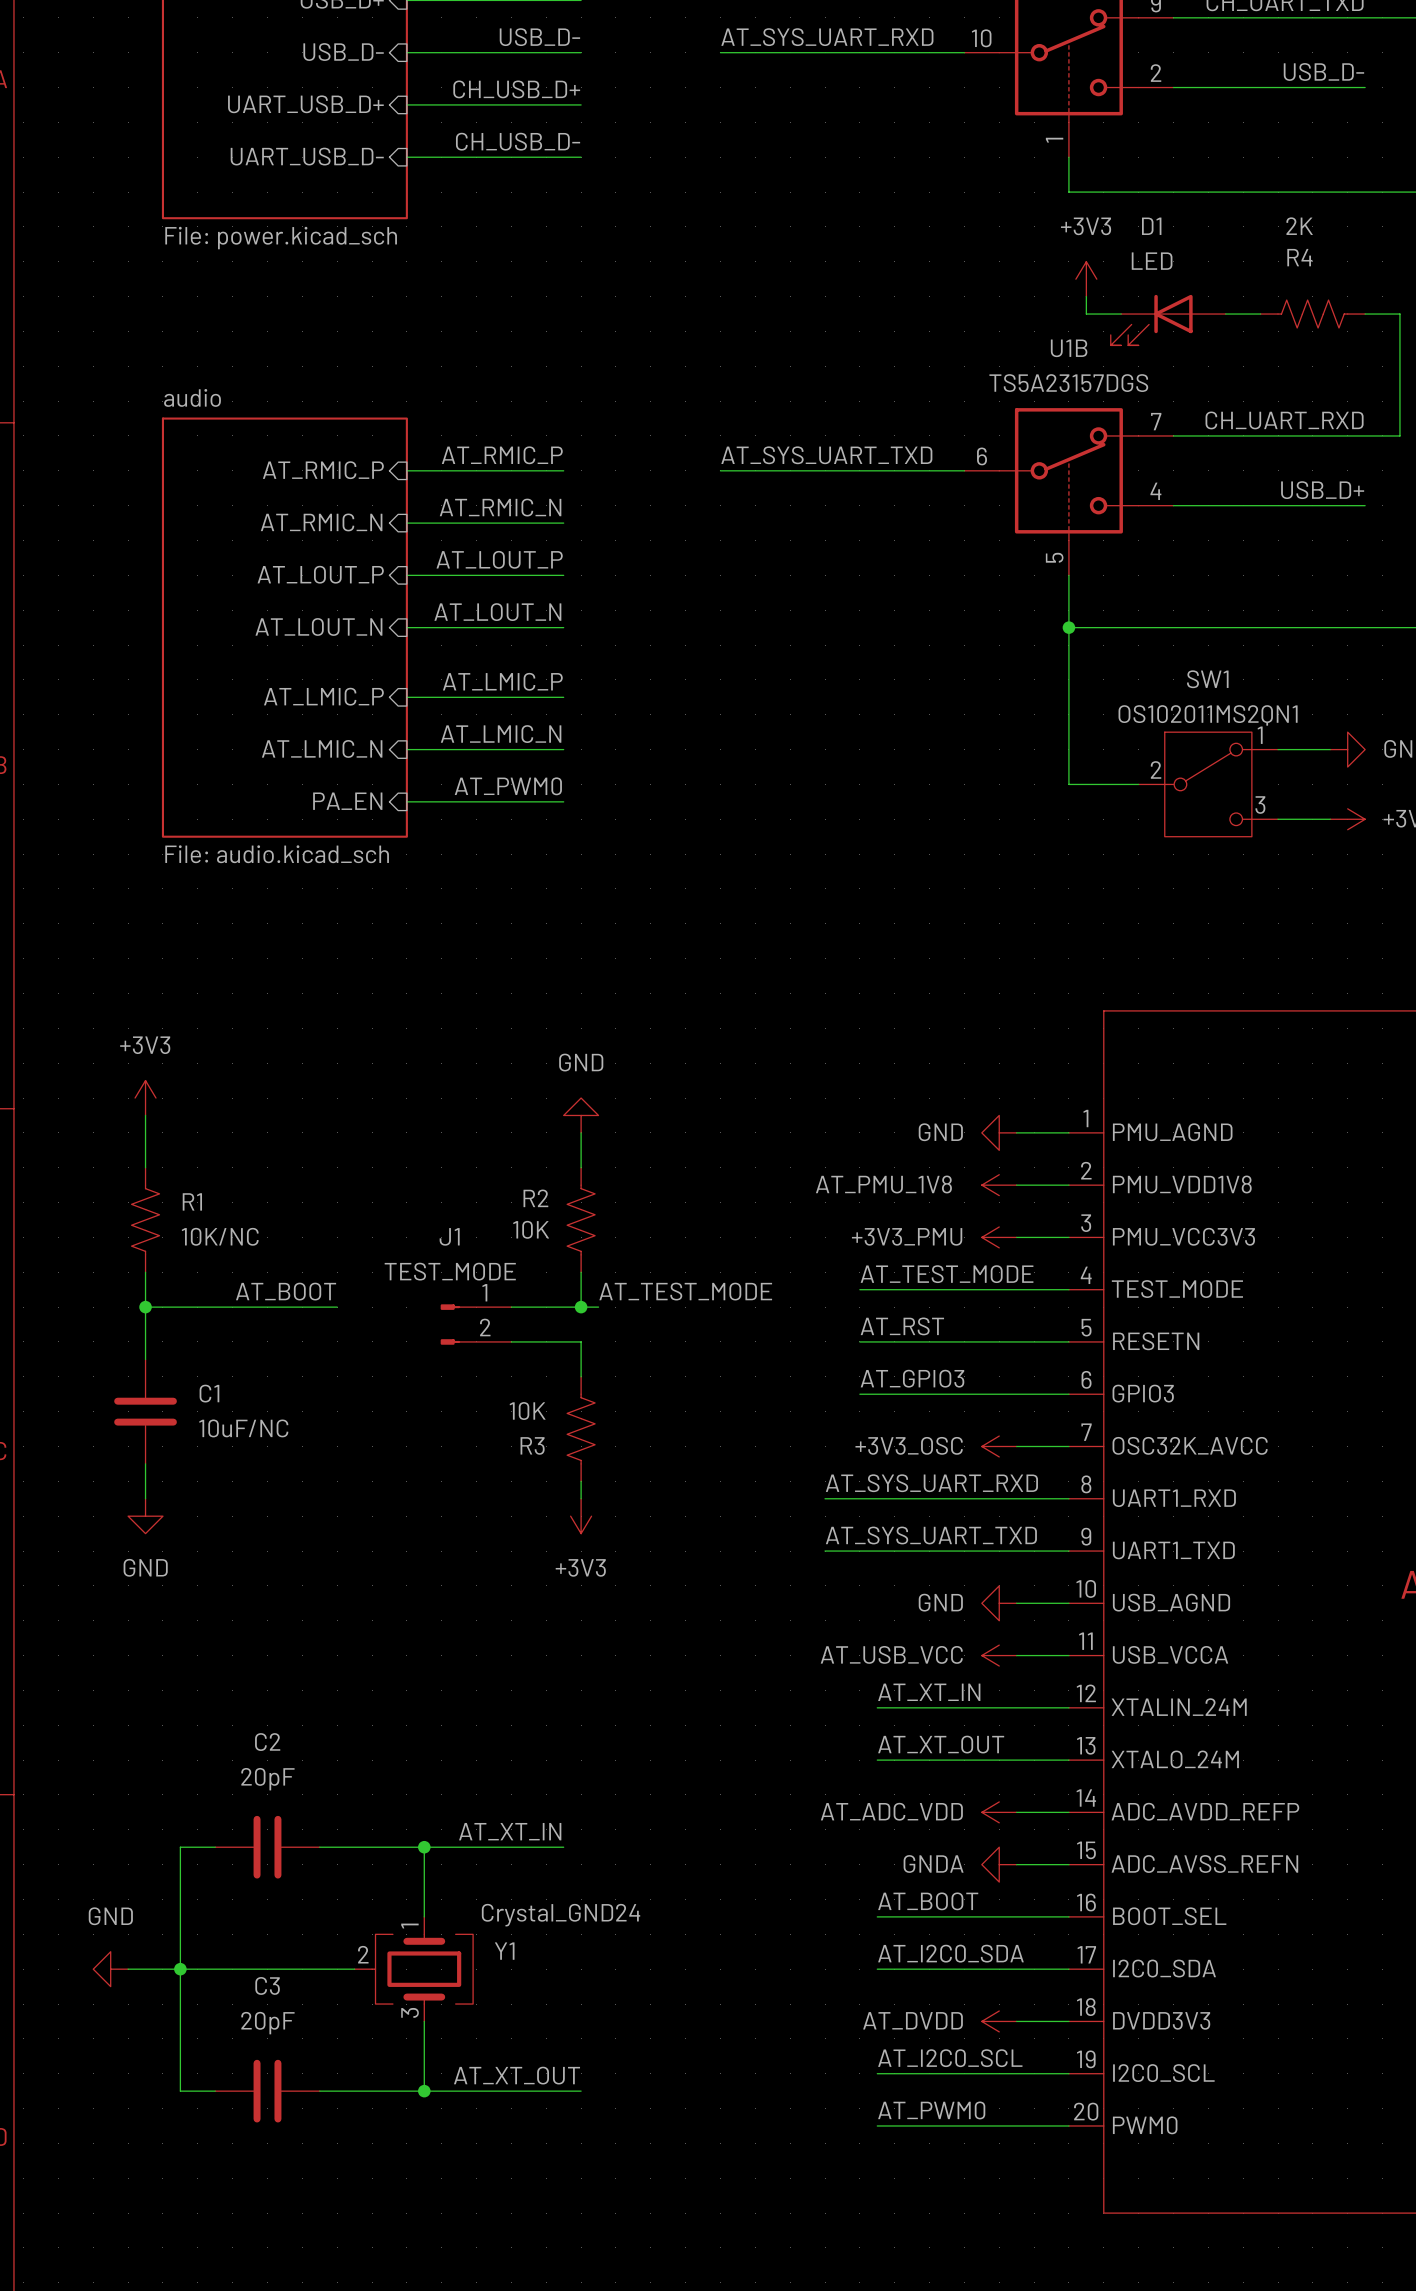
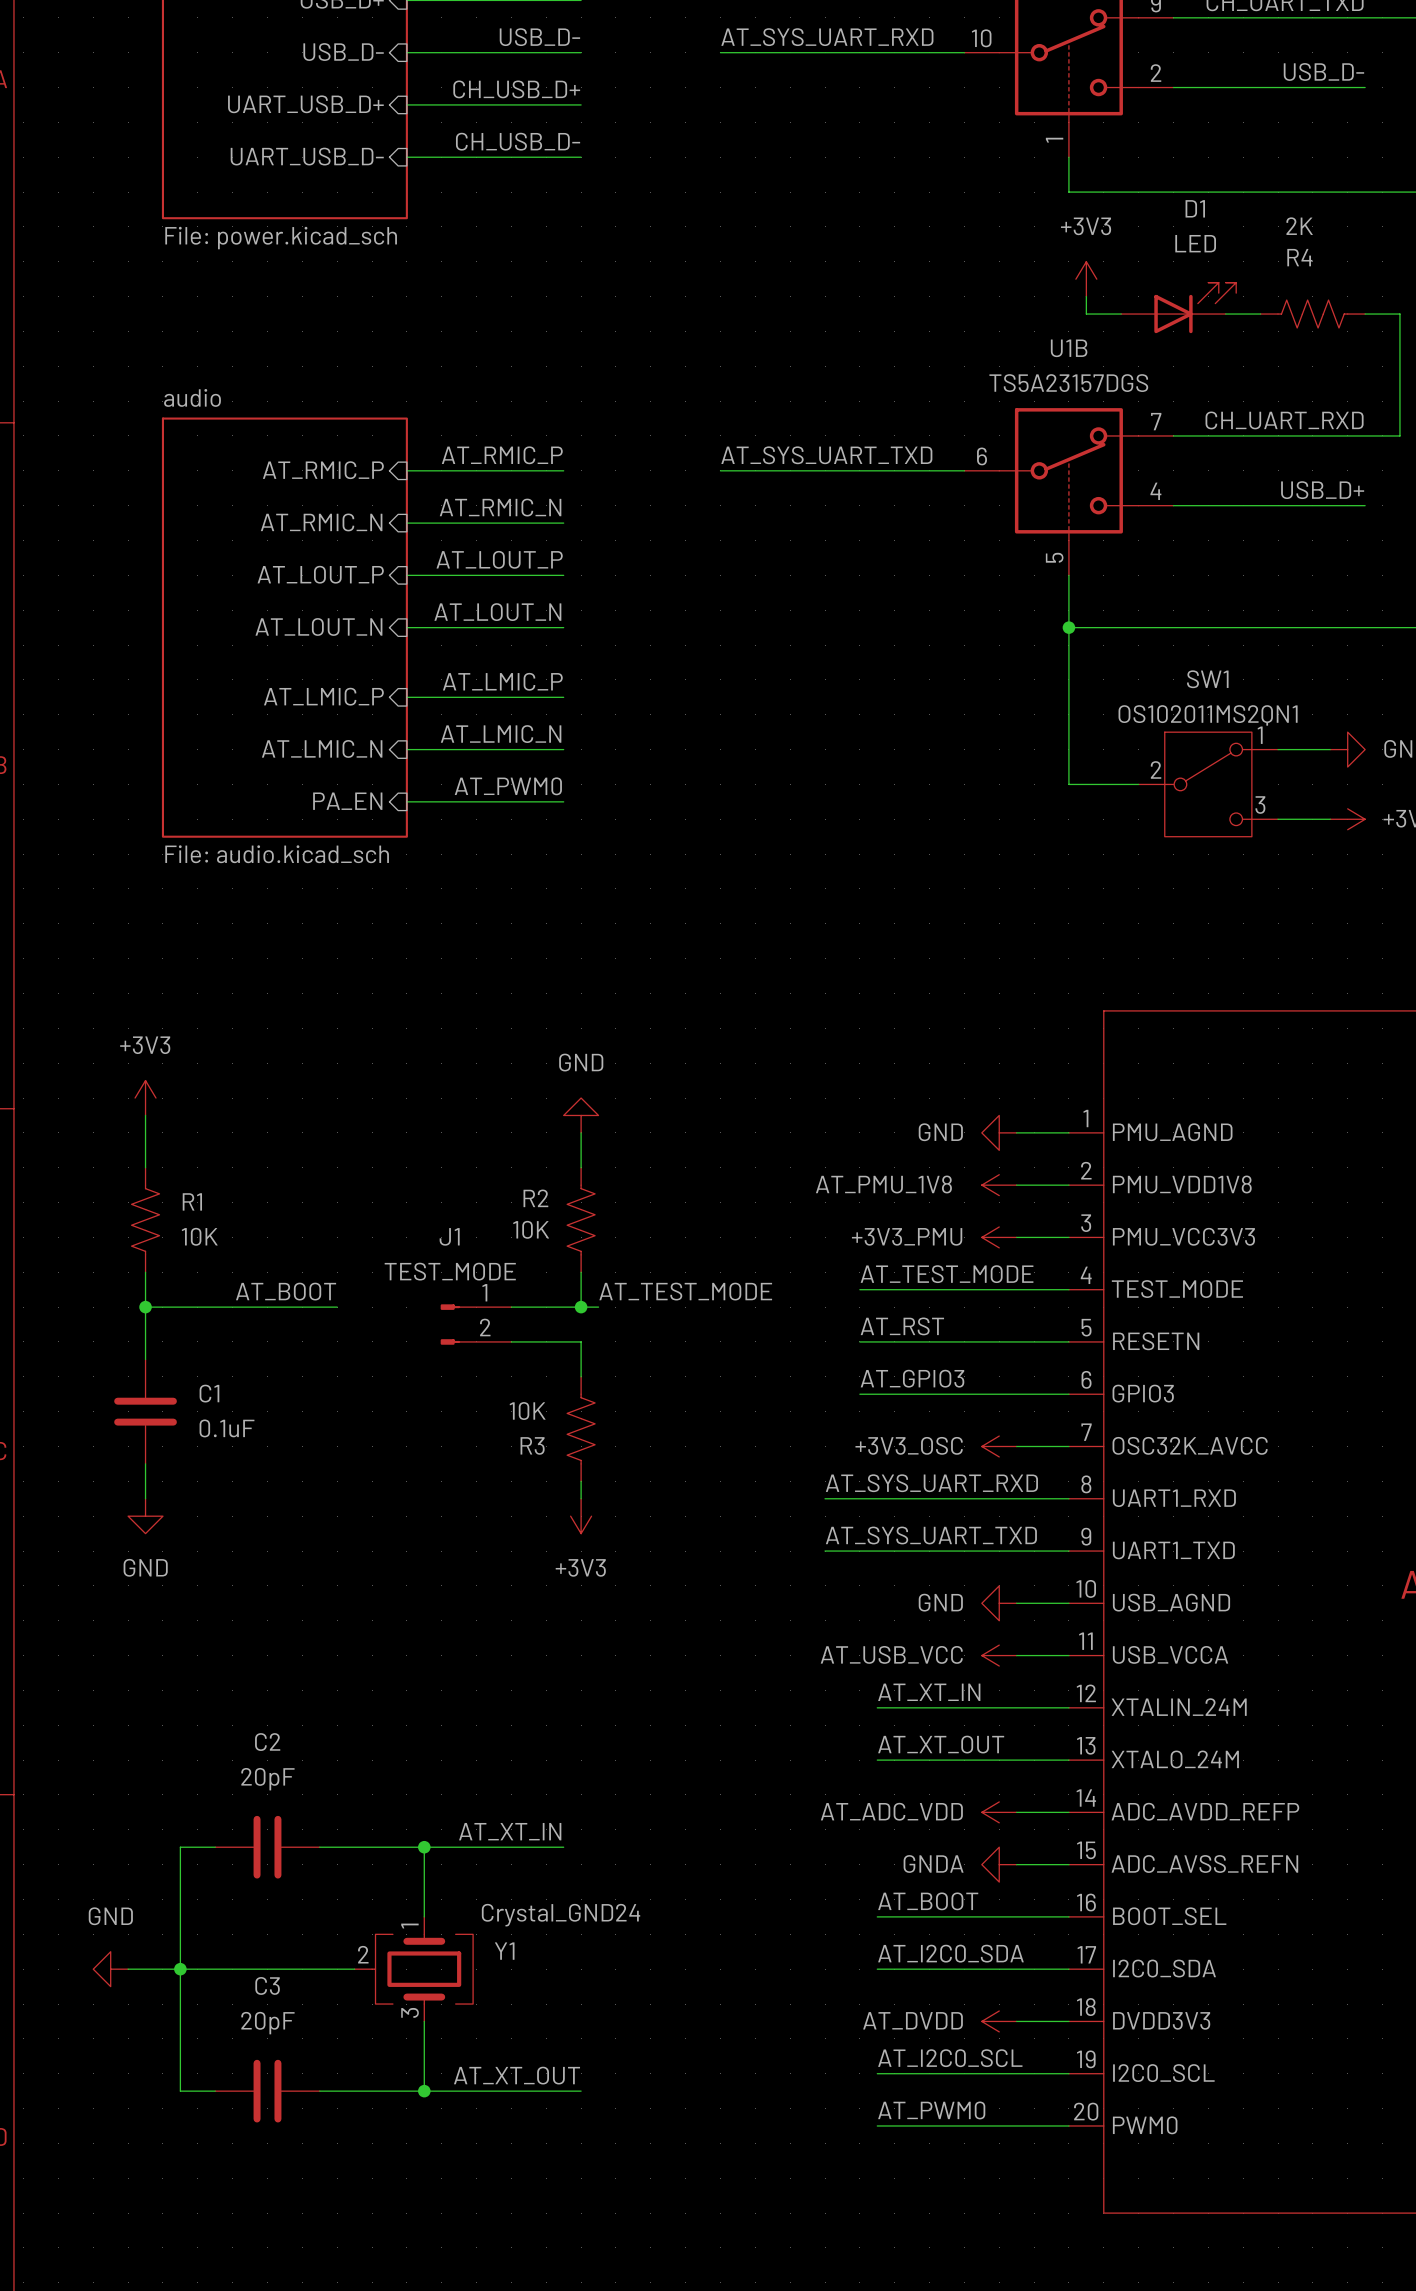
D1 name position: D1 (1151, 226) -> D1 (1195, 208)
D1 value position: LED (1152, 261) -> LED (1195, 243)
D1 rotation: 0° (1151, 320) -> 180° (1195, 307)
R1 value: 10K/NC (220, 1236) -> 10K (199, 1236)
C1 value: 10uF/NC (243, 1428) -> 0.1uF (227, 1428)

